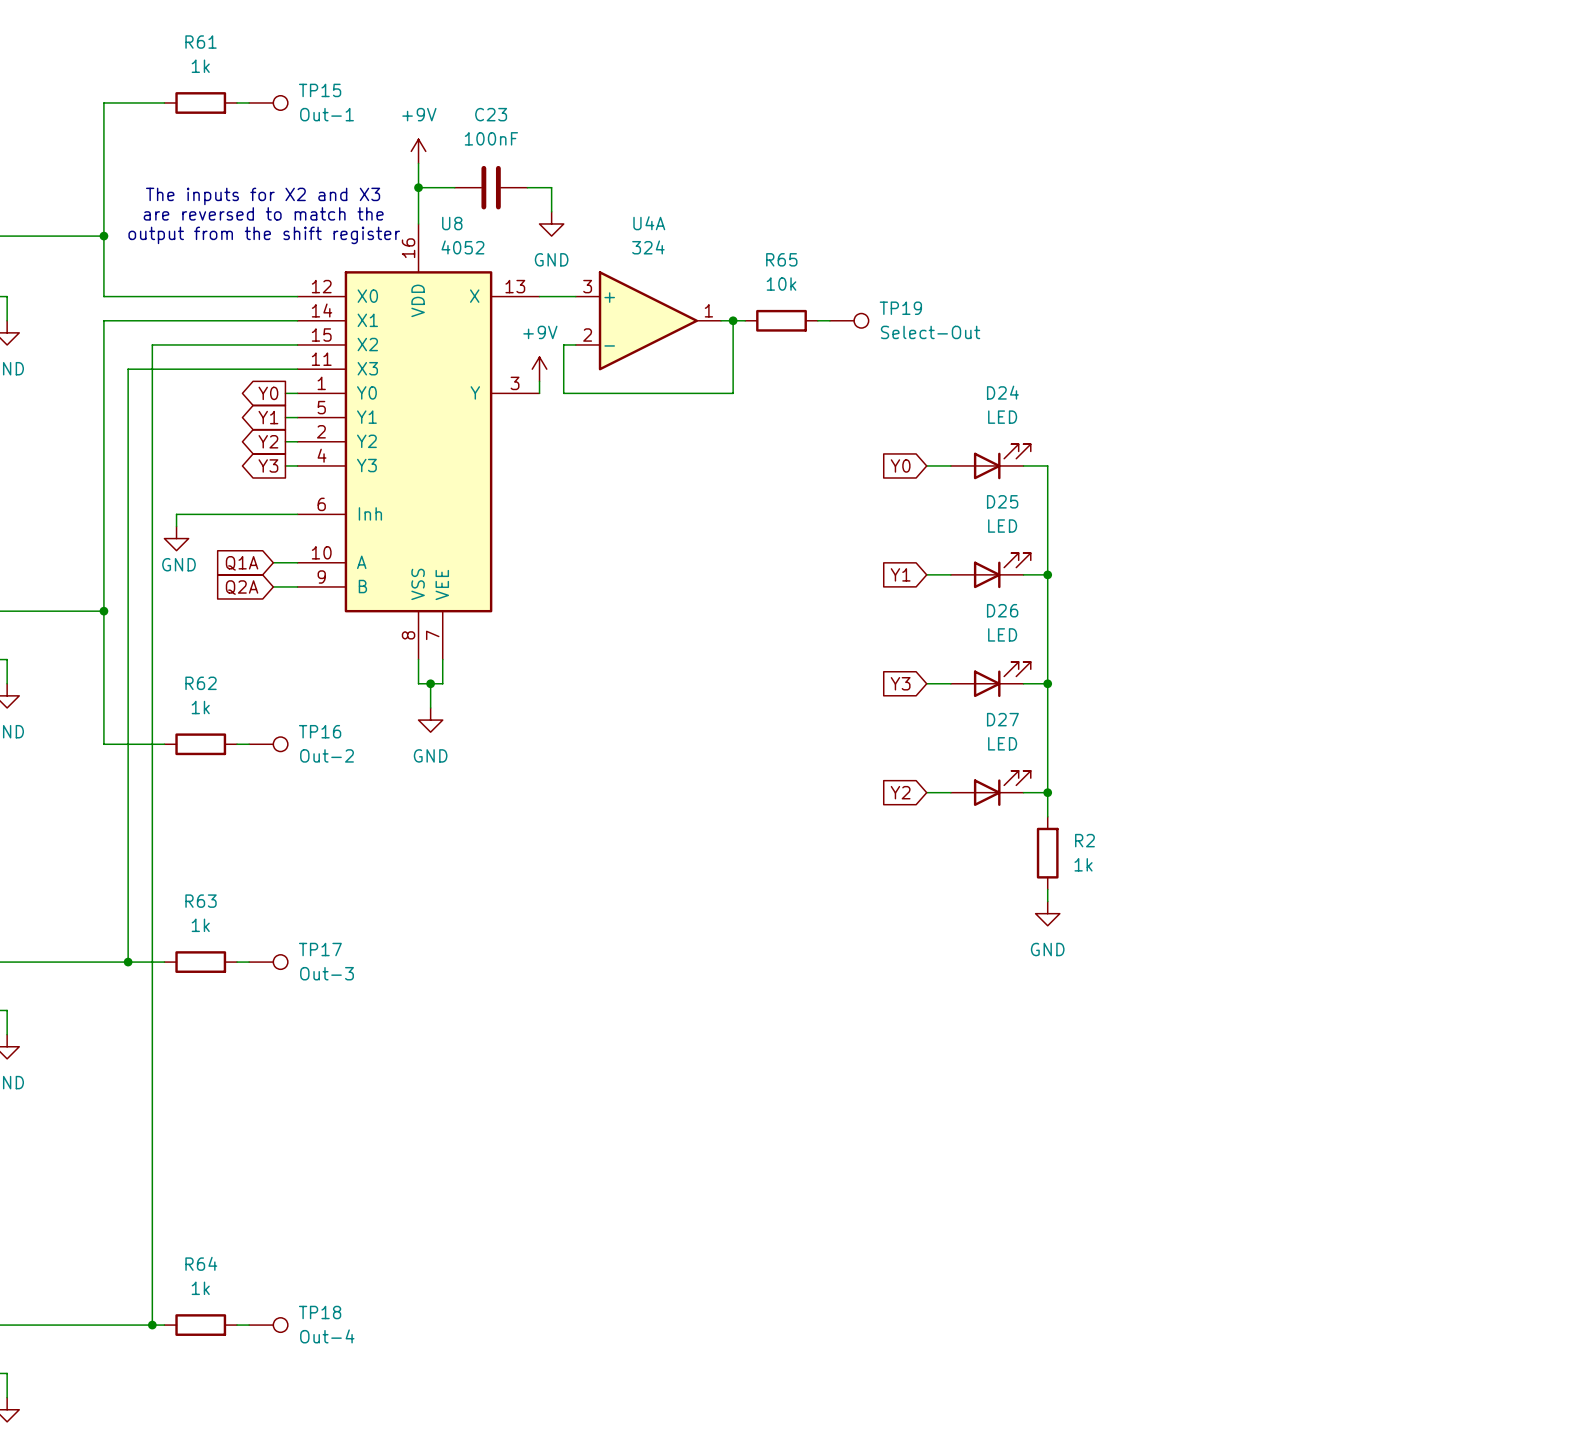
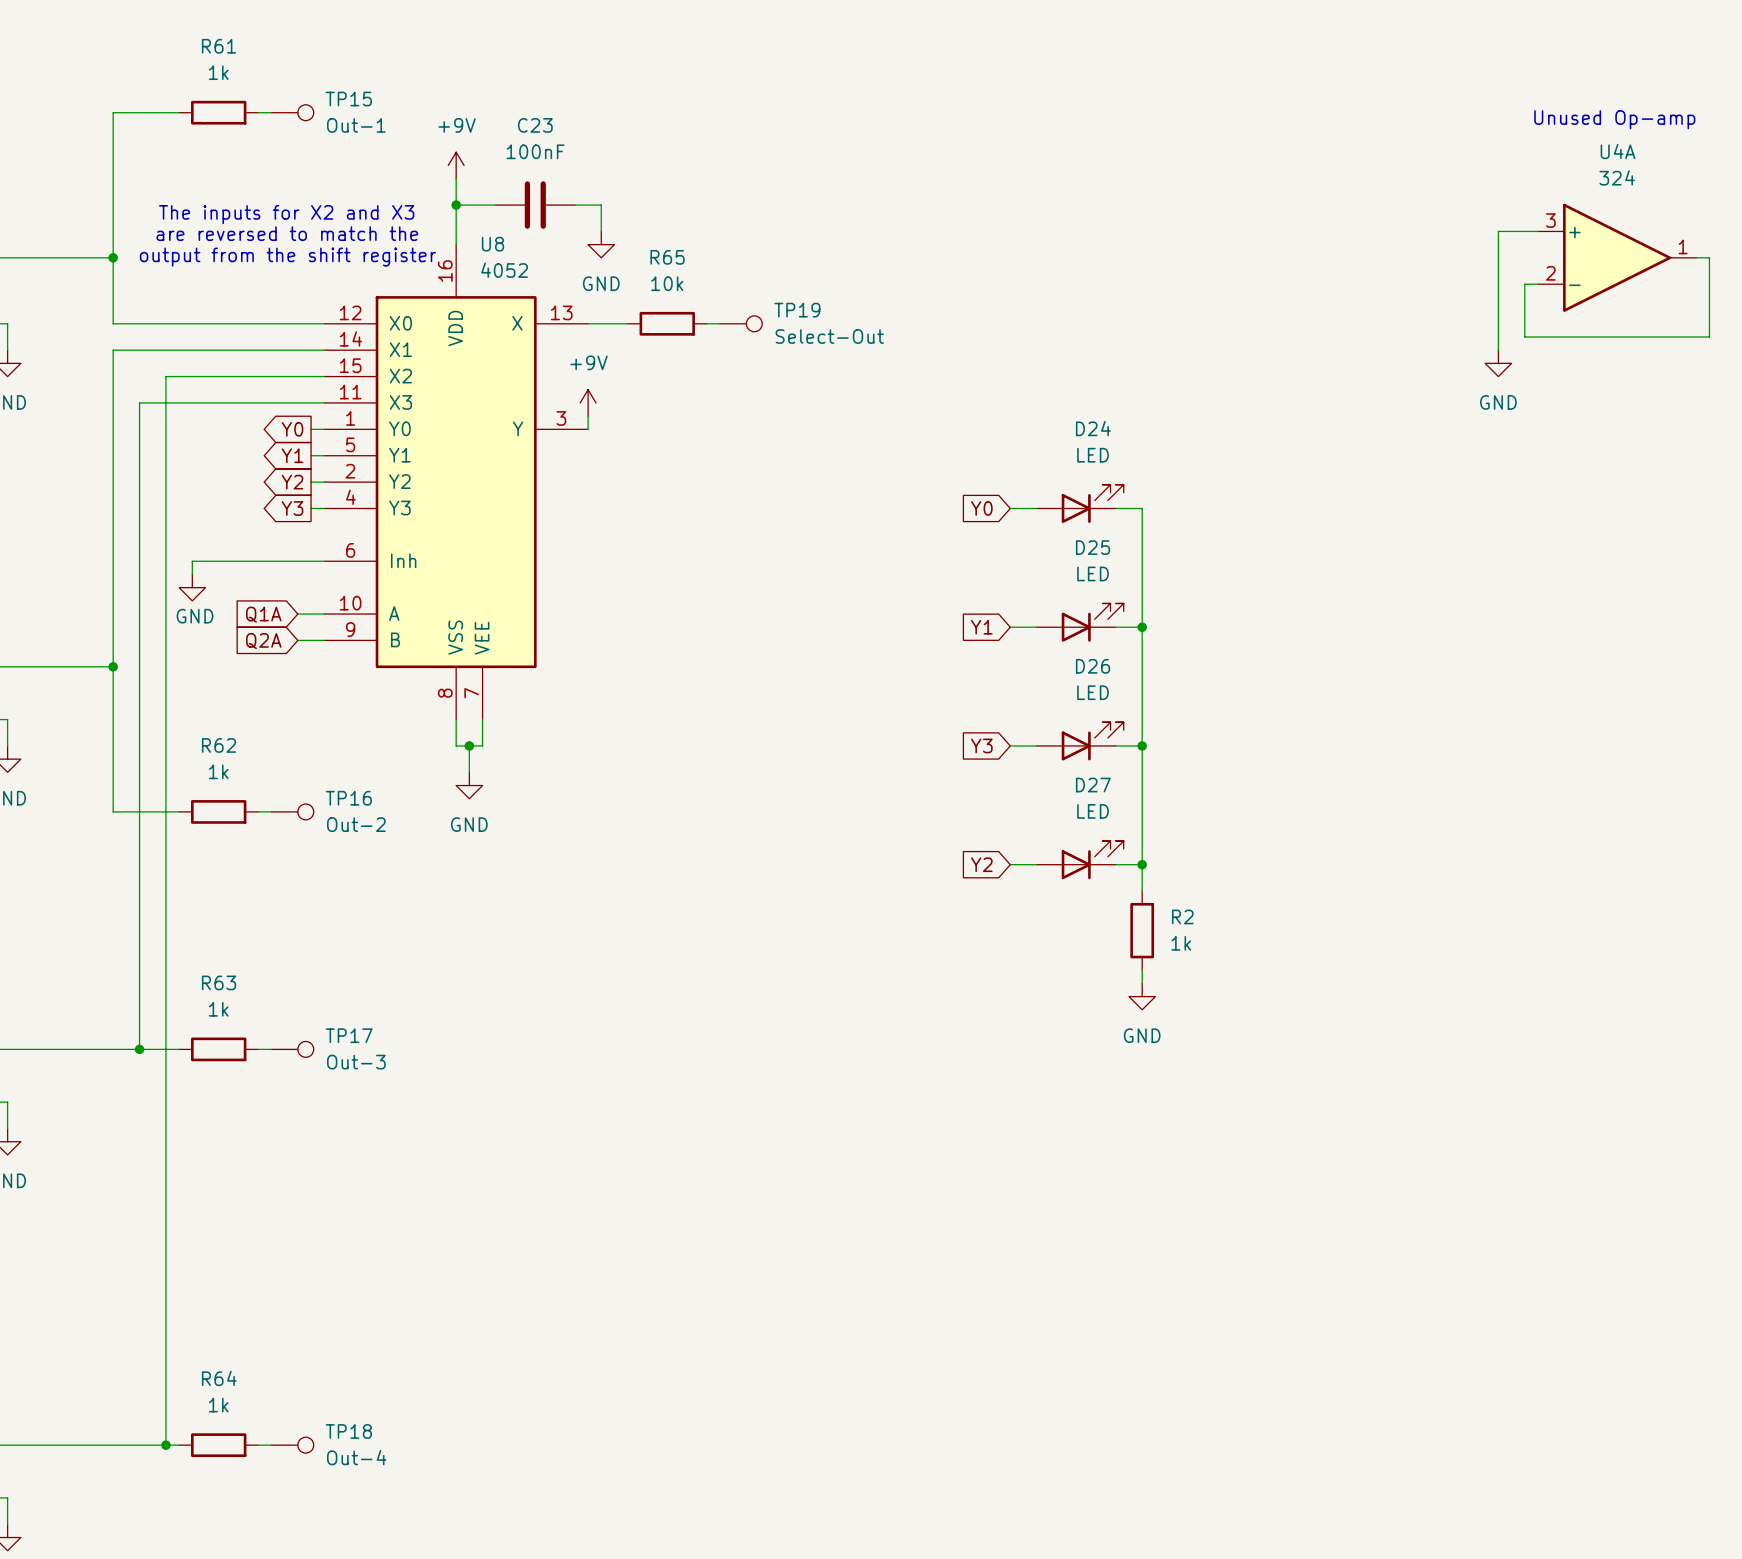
text: none -> Unused Op-amp (1614, 119)
wire: none -> (1537, 231) (1498, 231) (1498, 350)
wire: none -> (1696, 257) (1709, 257) (1709, 336) (1524, 336) (1524, 284) (1537, 284)
U4A position: (648, 320) -> (1617, 257)
wire: (721, 320) (745, 320) -> none
wire: (733, 320) (733, 393) (563, 393) (563, 344) (575, 344) -> none
junction: (733, 320) -> none
R65 position: (781, 320) -> (667, 323)
wire: (817, 320) (829, 320) -> (706, 323) (720, 323)
TP19 position: (849, 320) -> (741, 323)
power symbol: none -> GND (1498, 363)

